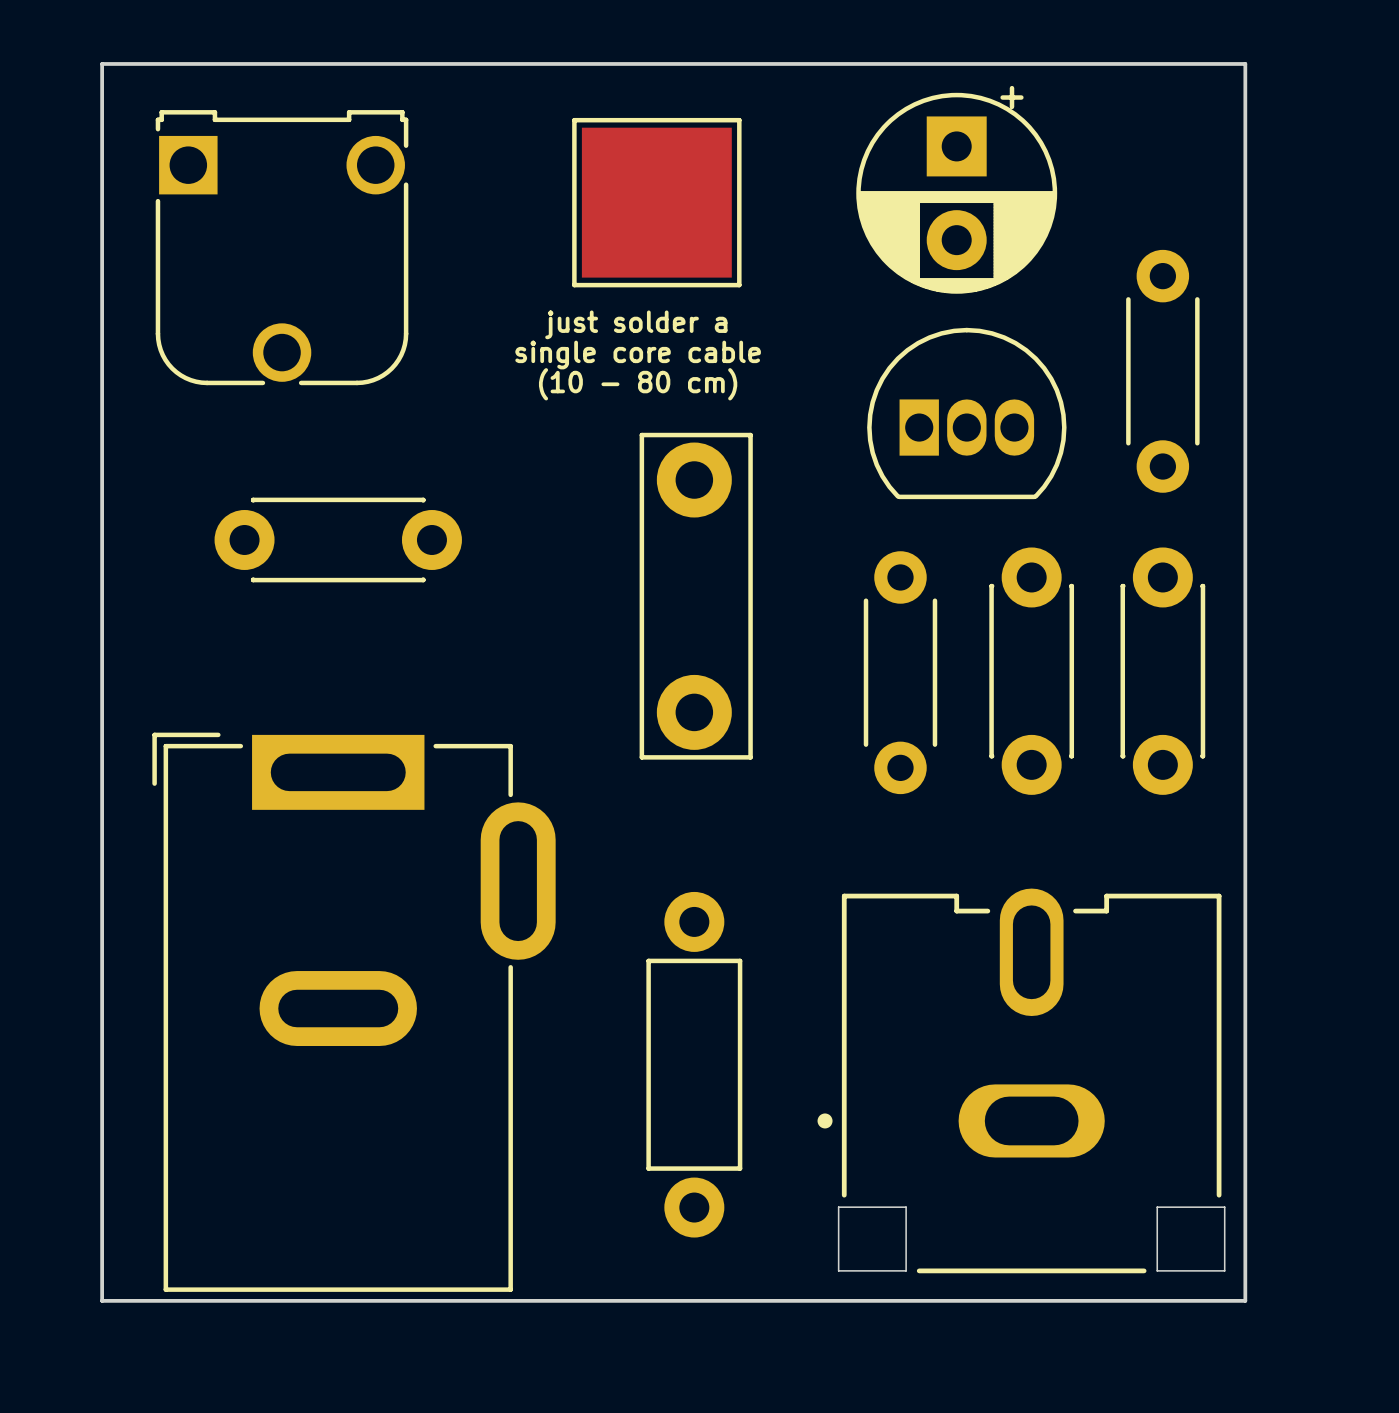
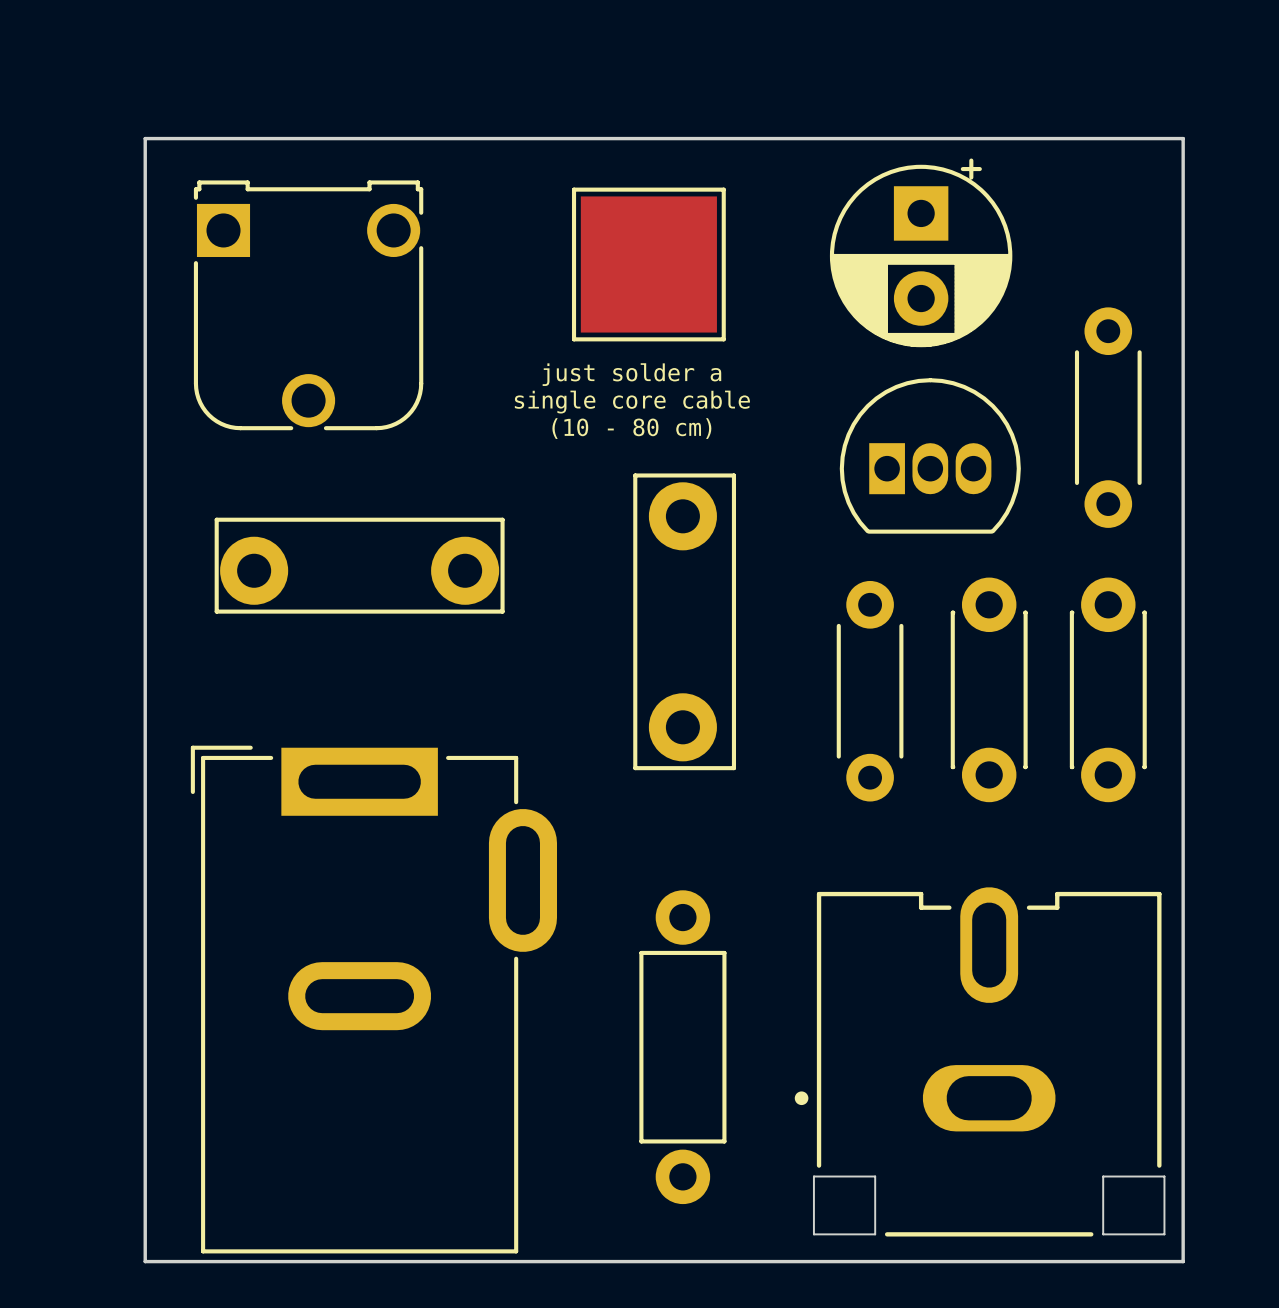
part footprint: [214, 497, 462, 583] -> [214, 517, 505, 614]

